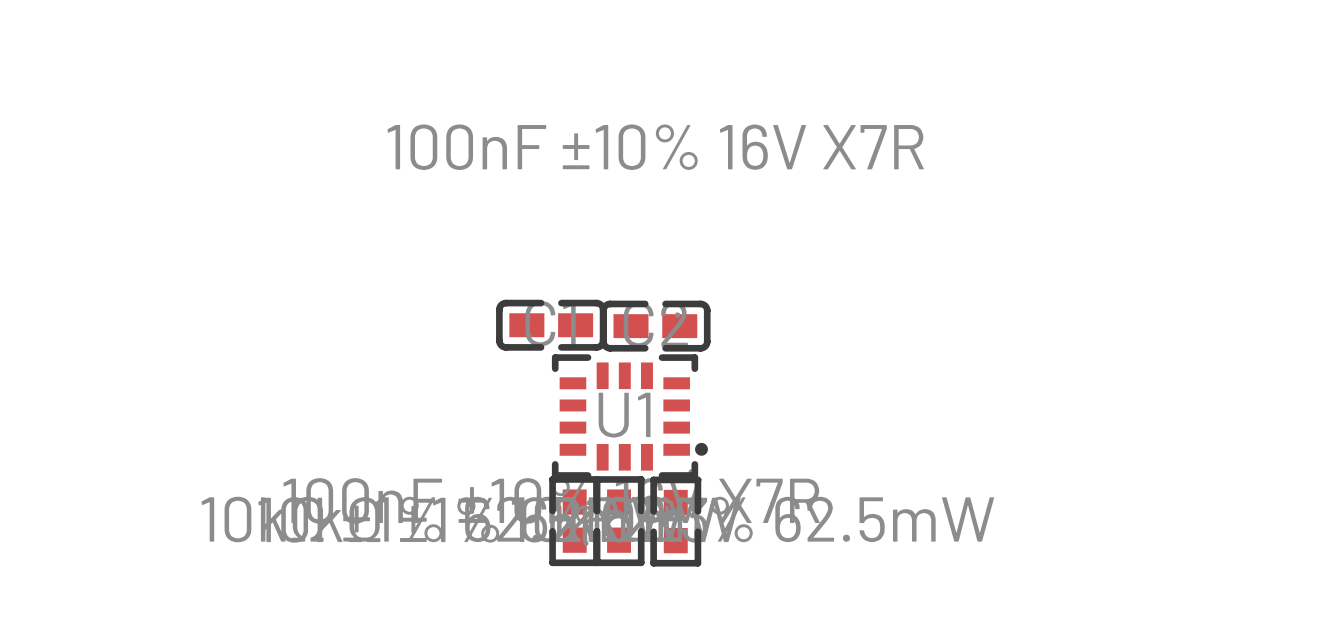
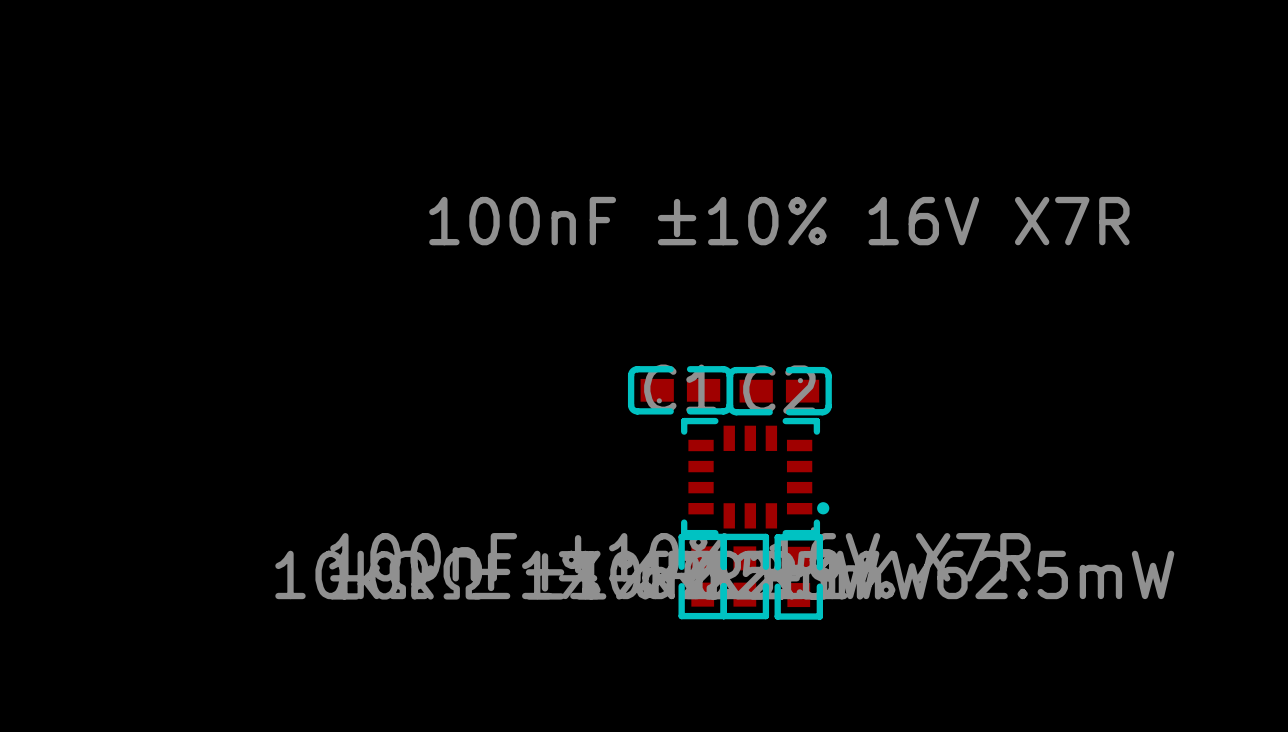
U1 name: U1 (624, 415) -> none

